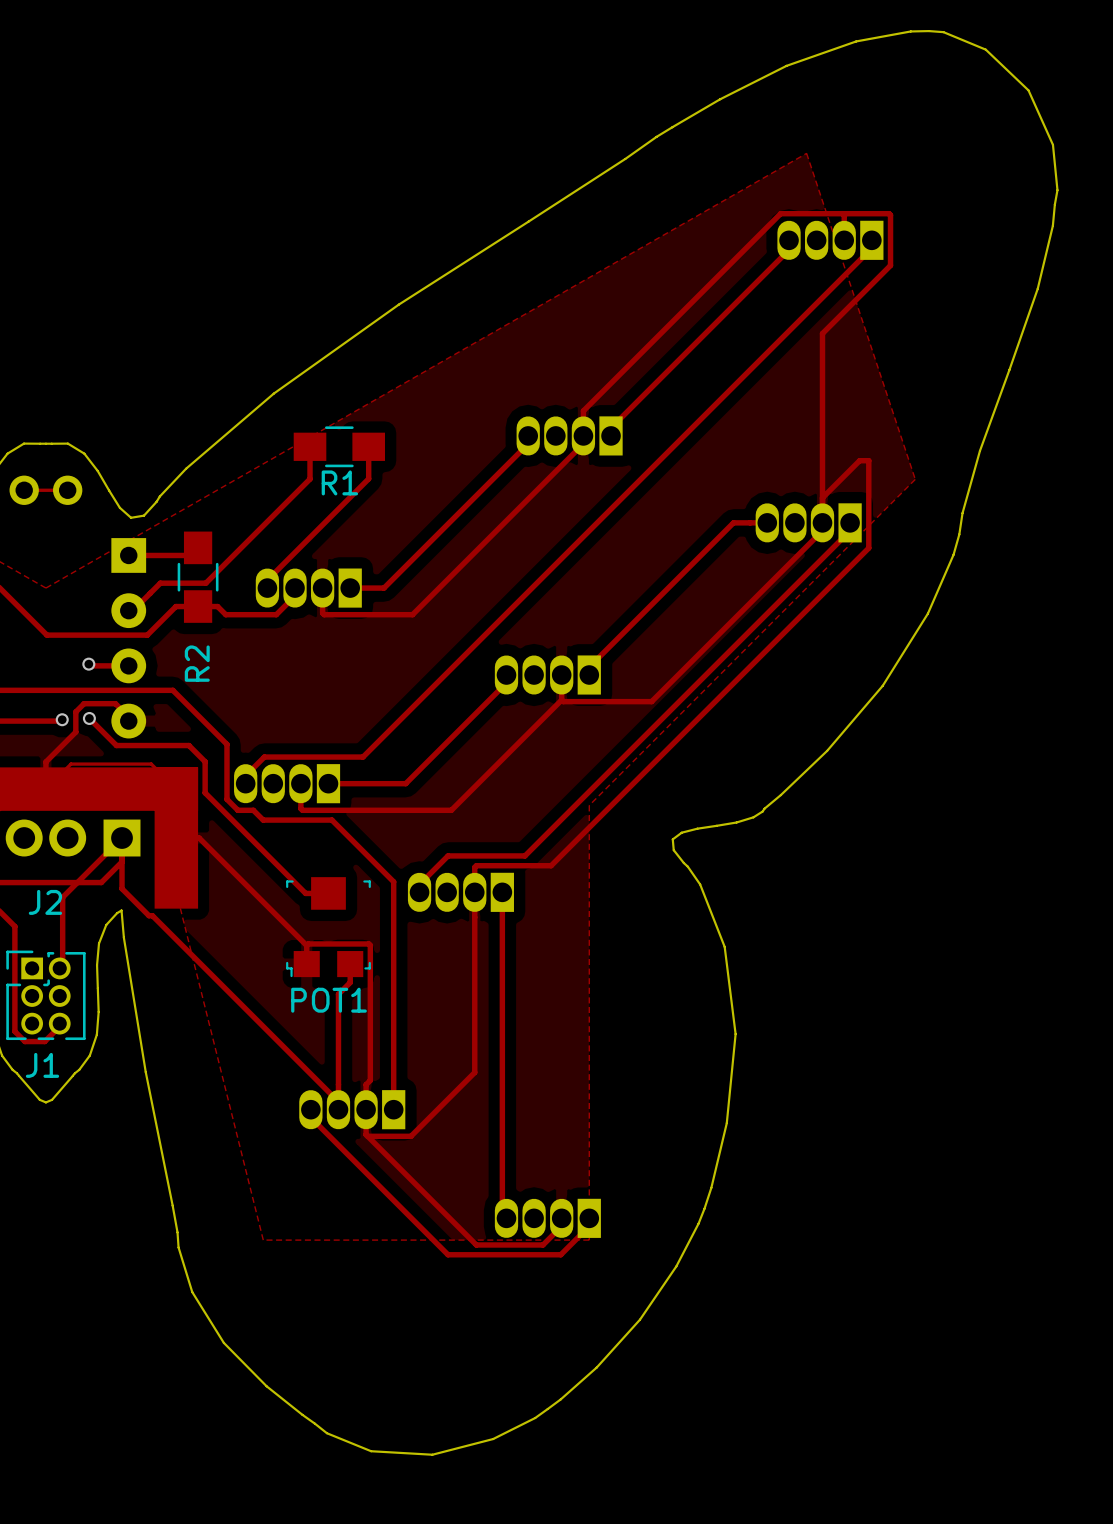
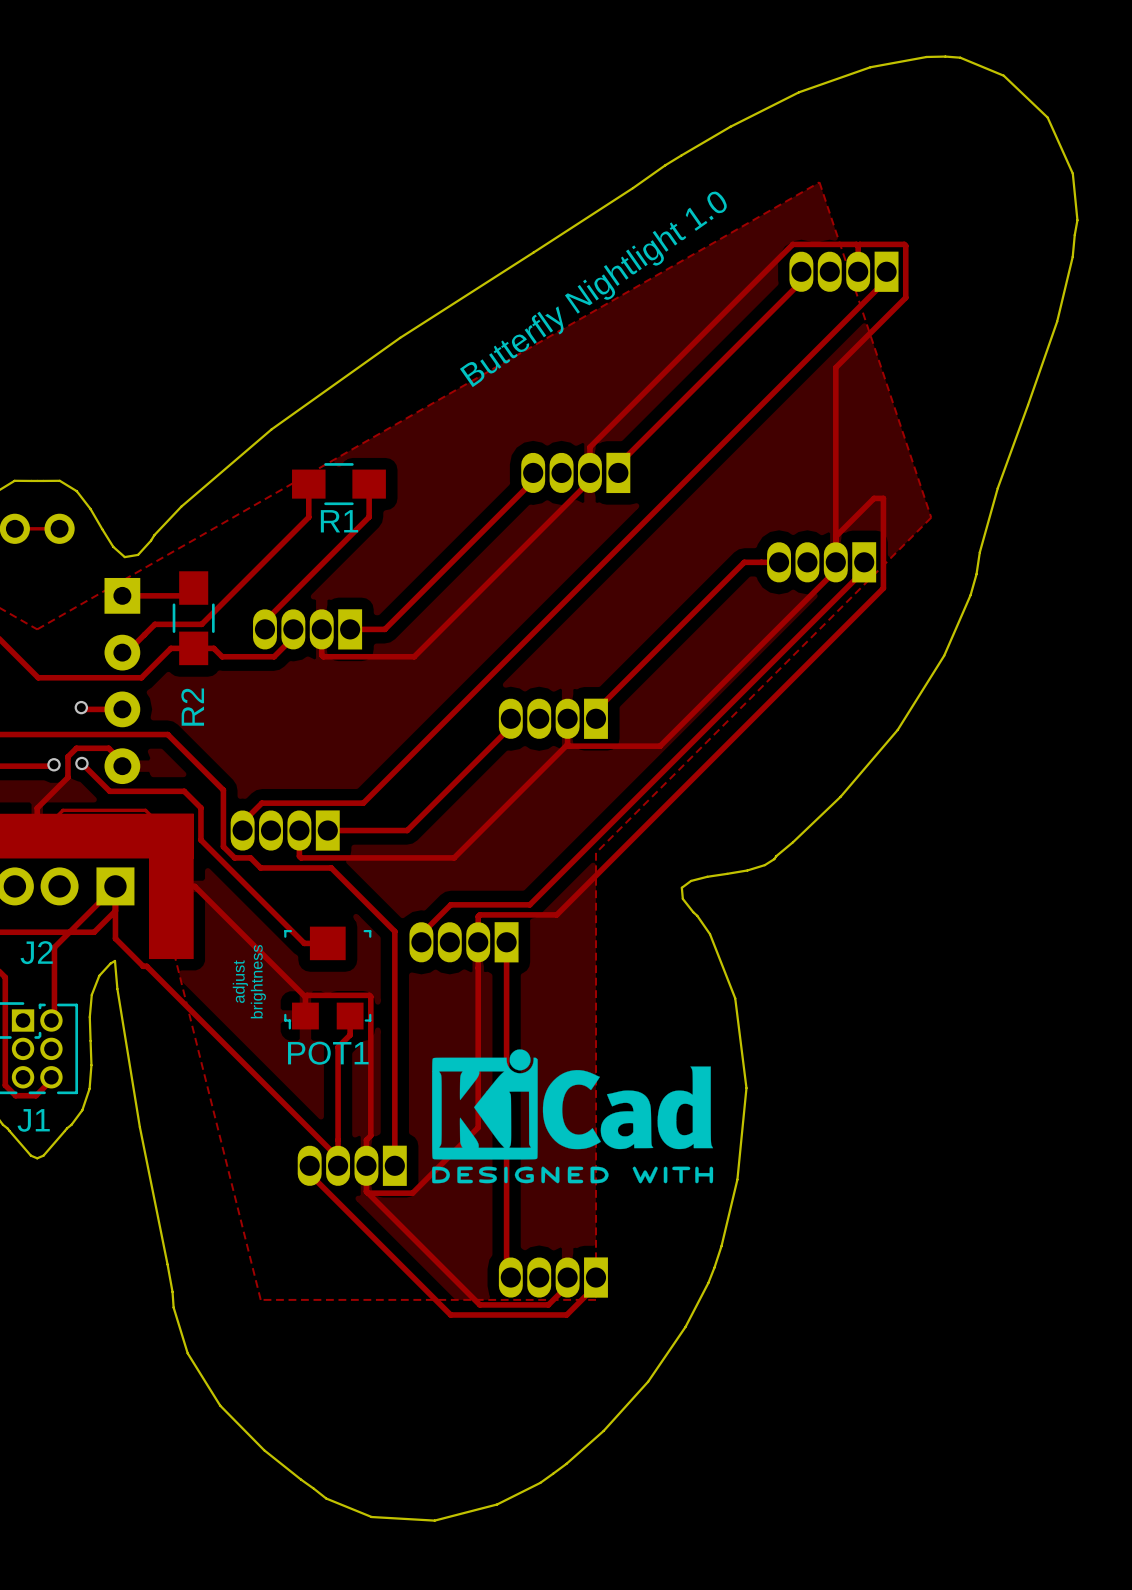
text: none -> Butterfly Nightlight 1.0 (593, 288)
text: none -> adjust (240, 981)
text: none -> brightness (258, 981)
drawing: none -> [432, 1049, 714, 1184]

